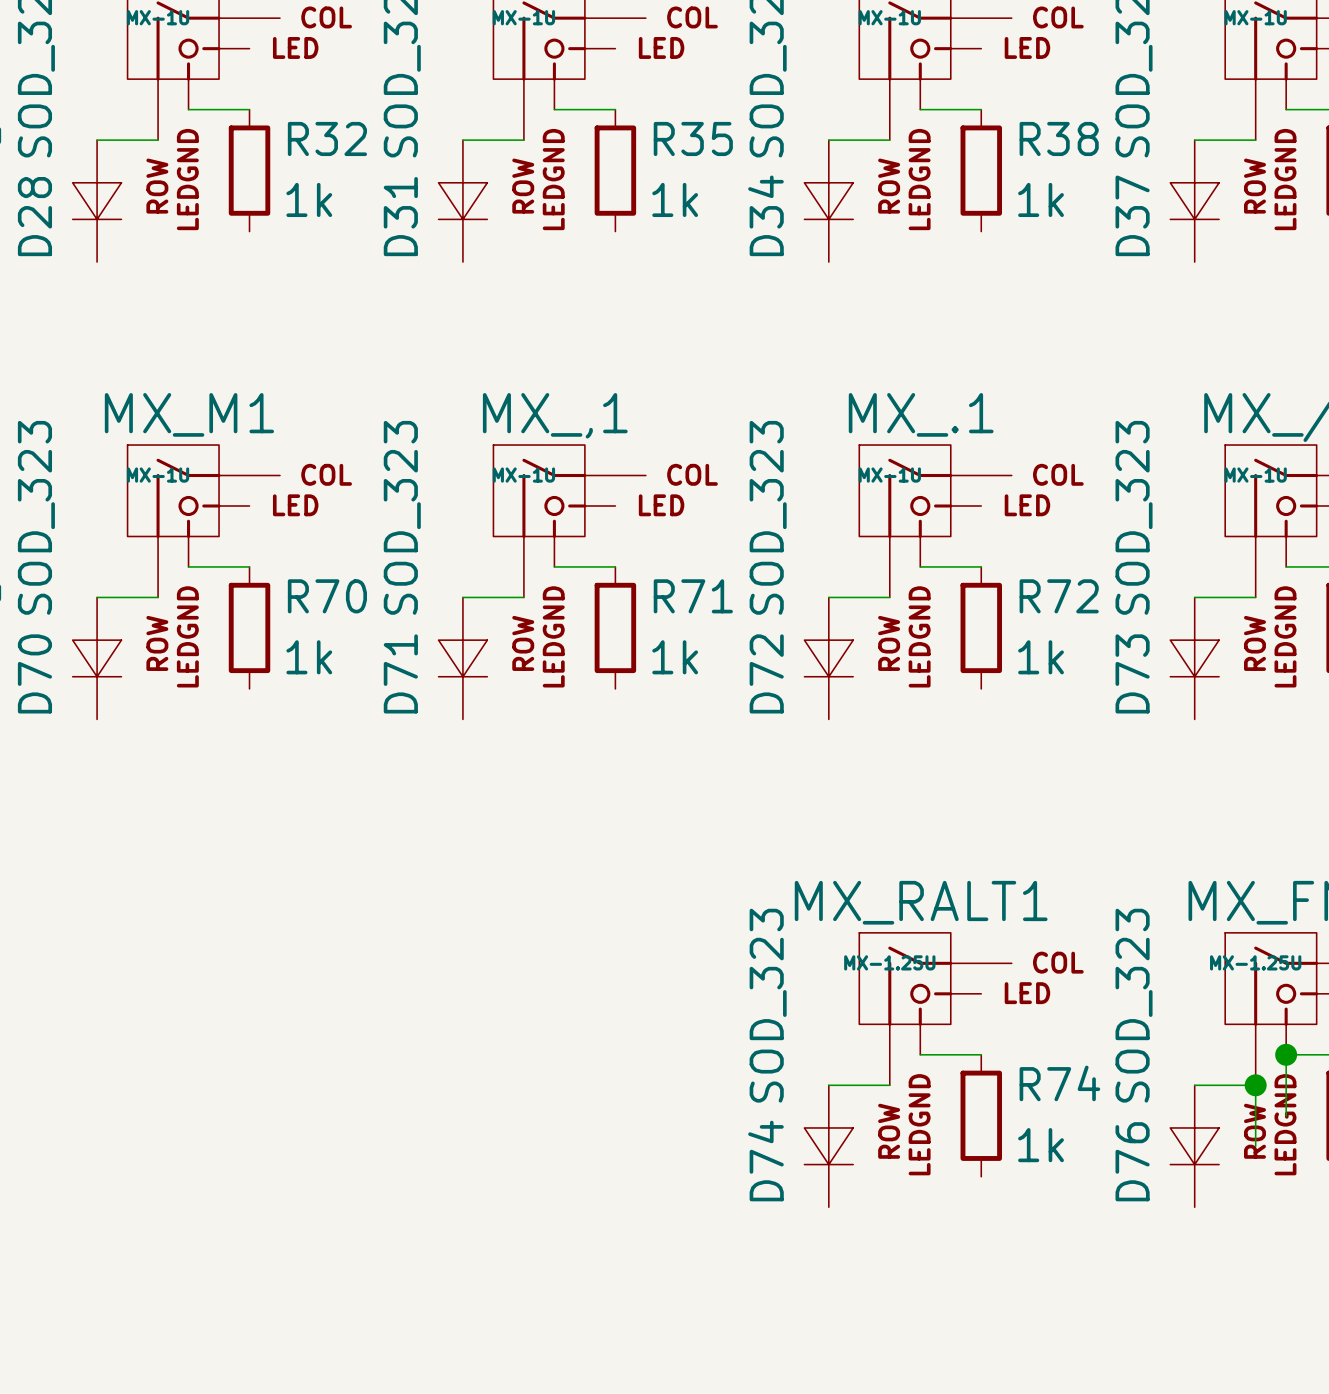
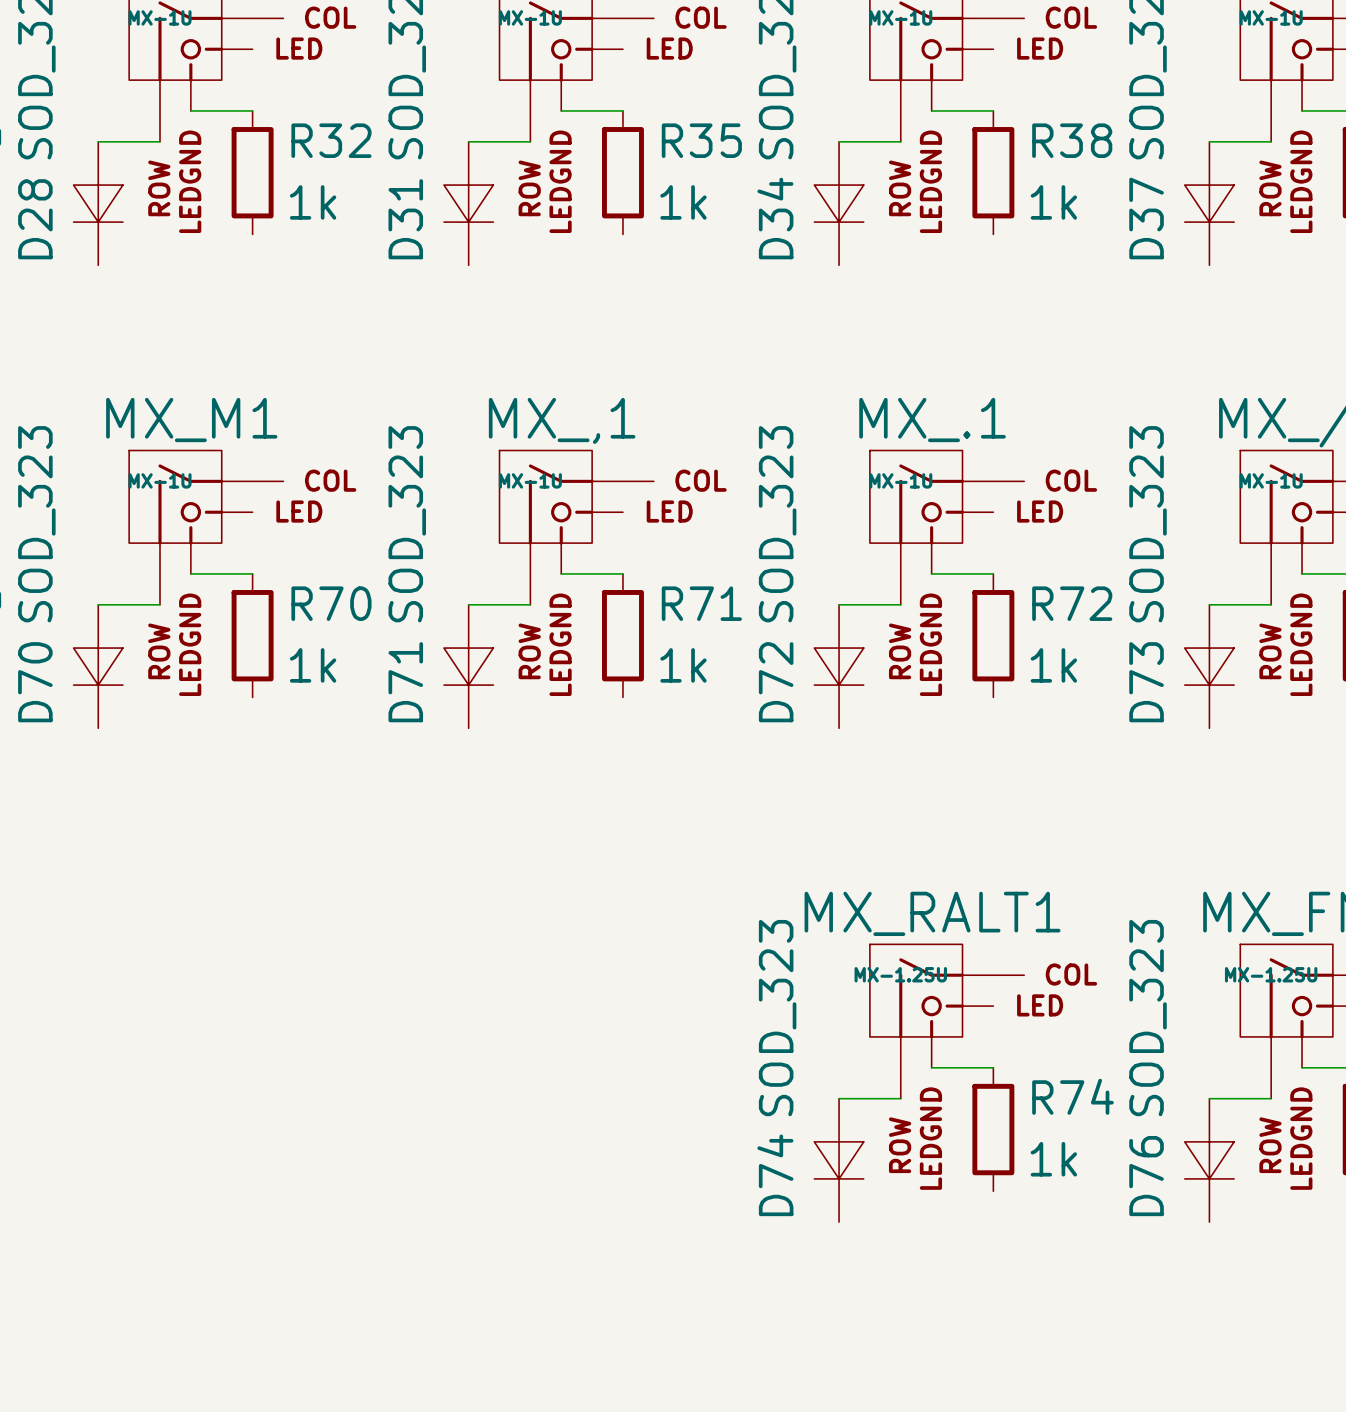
wire: (1286, 1054) (1286, 1115) -> none
junction: (1286, 1054) -> none
wire: (1255, 1085) (1255, 1146) -> none
junction: (1255, 1085) -> none

